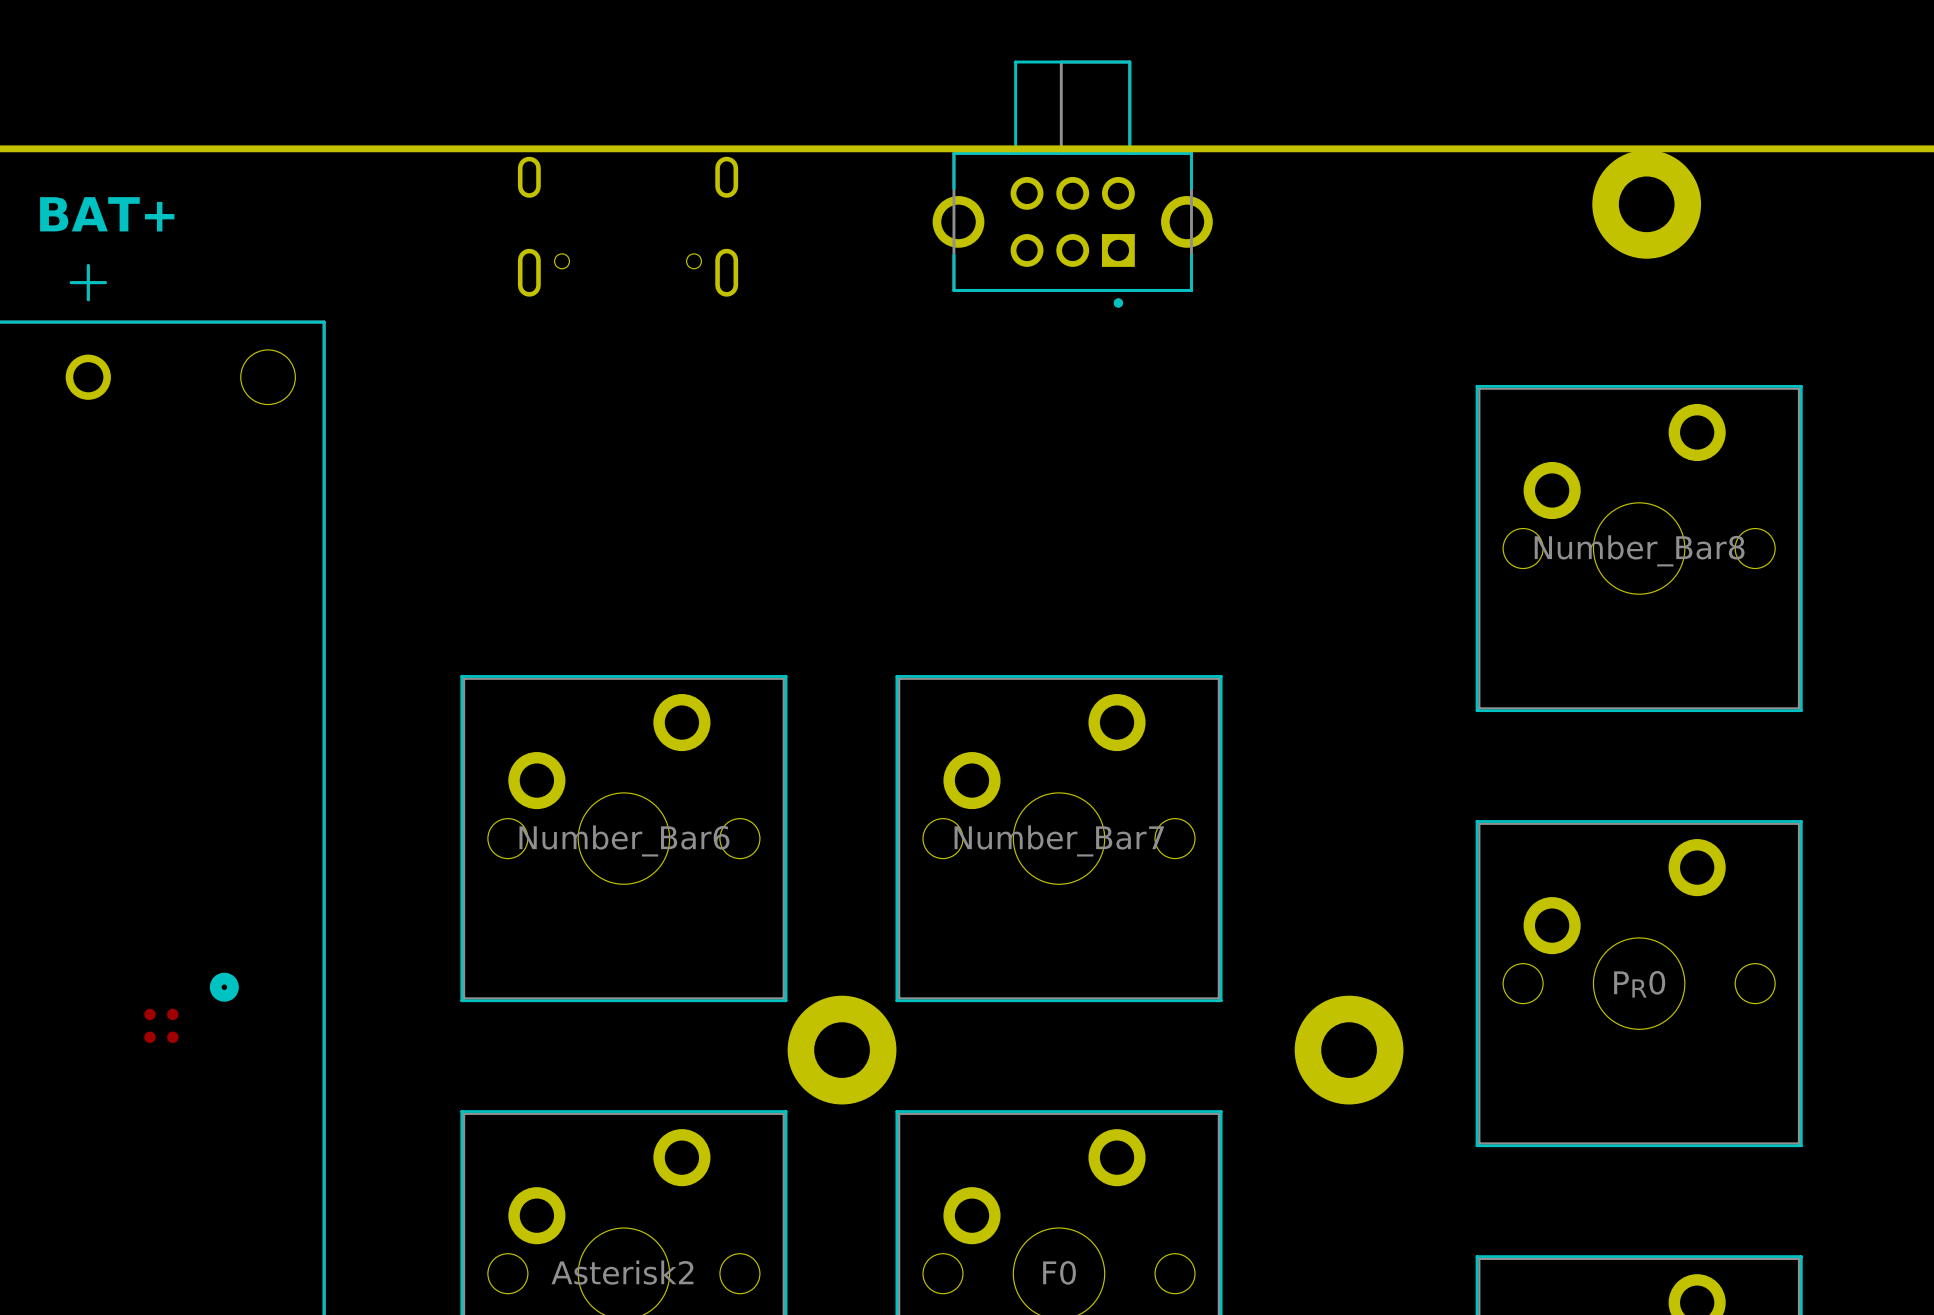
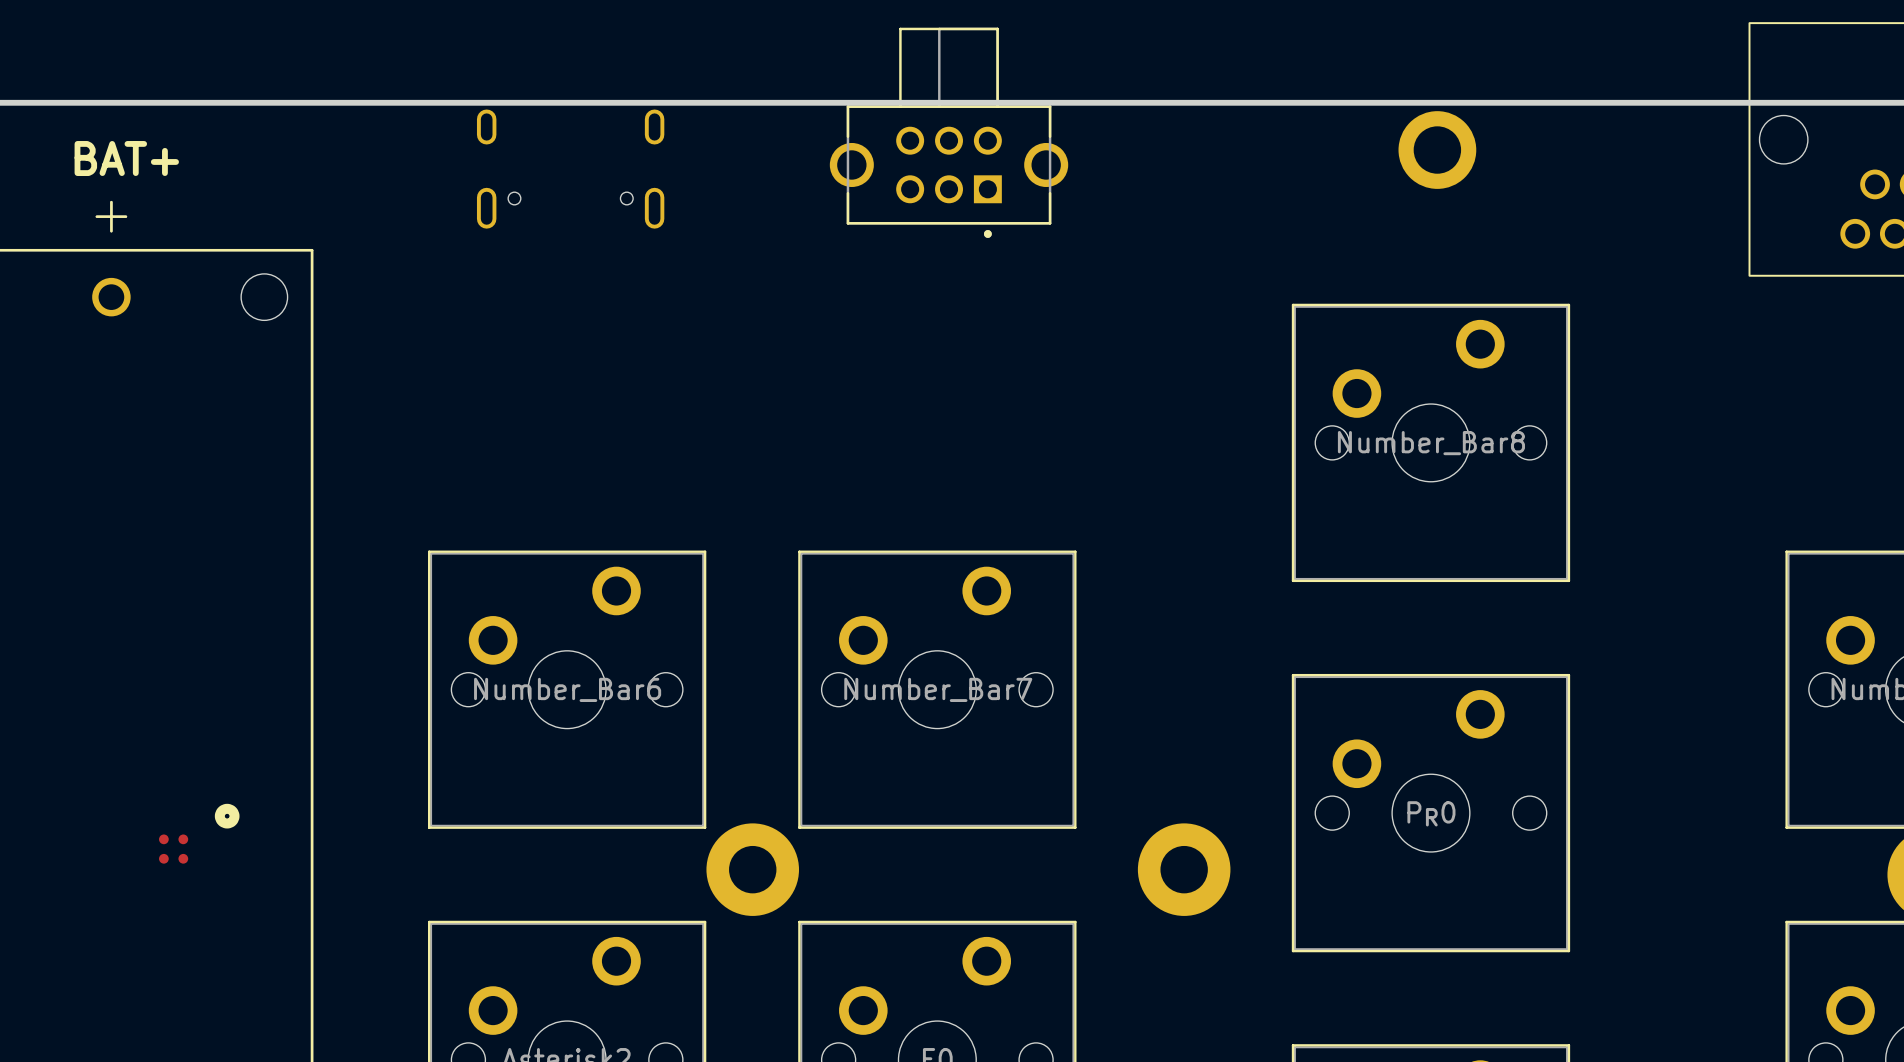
part footprint: [1592, 149, 1702, 259] -> [1398, 111, 1477, 189]

